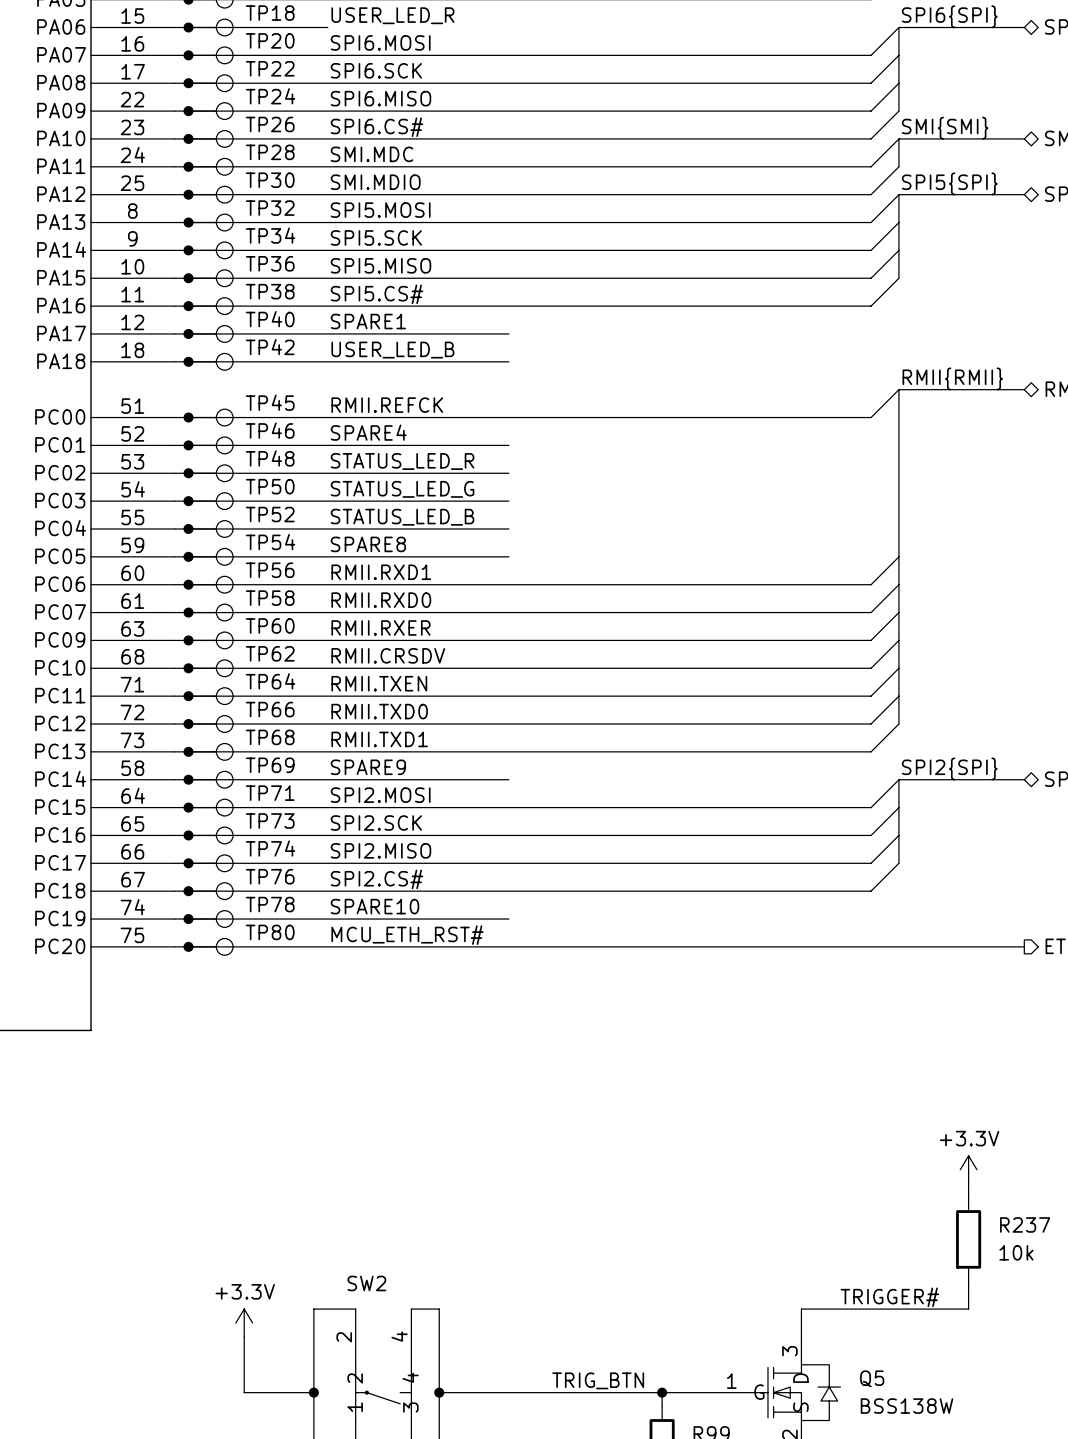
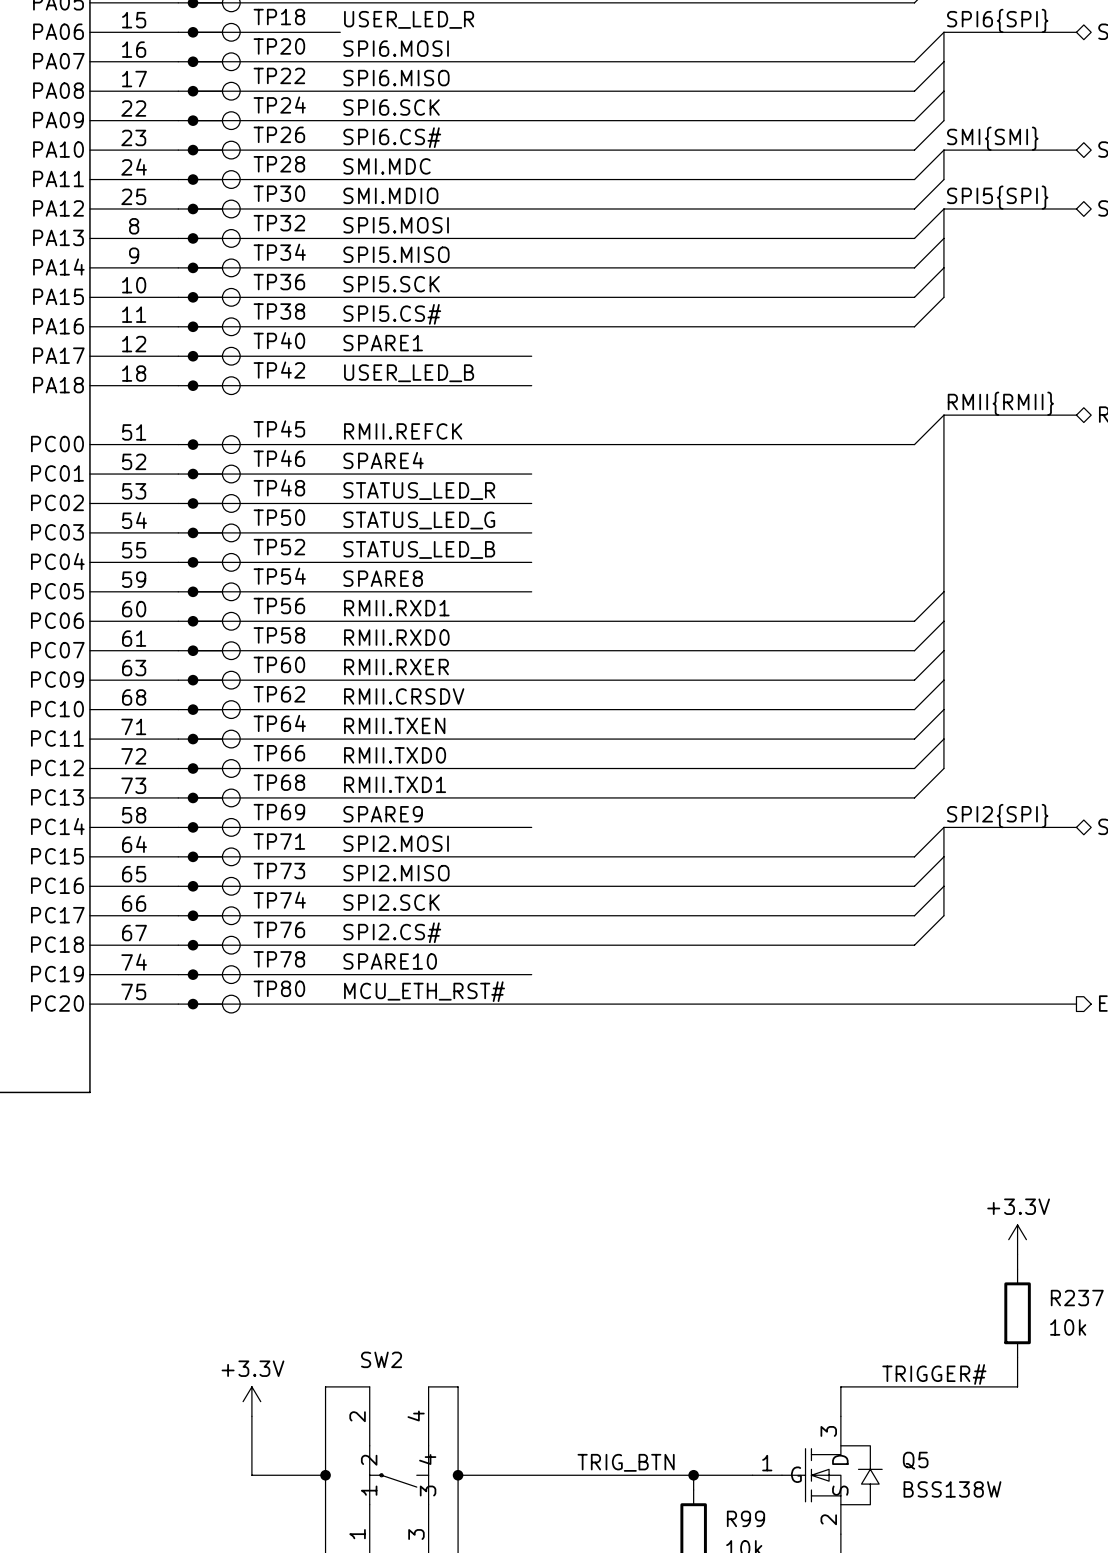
label: SPI6.SCK (376, 70) -> SPI6.MISO (396, 78)
label: SPI6.MISO (380, 98) -> SPI6.SCK (391, 107)
label: SPI5.SCK (376, 237) -> SPI5.MISO (396, 254)
label: SPI5.MISO (380, 265) -> SPI5.SCK (391, 284)
label: SPI2.SCK (376, 823) -> SPI2.MISO (396, 873)
label: SPI2.MISO (380, 850) -> SPI2.SCK (391, 902)

